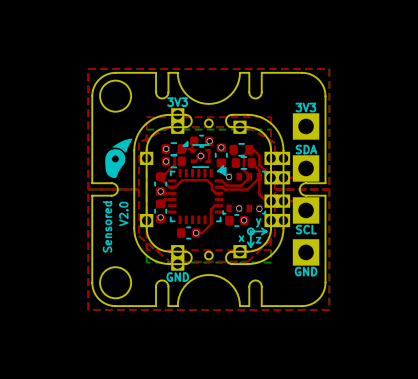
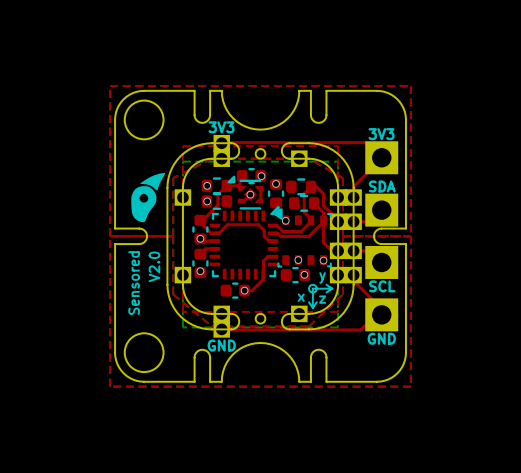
top track: none -> (221, 142) (365, 142) (381, 158) (354, 186) (354, 200)
top track: none -> (354, 281) (381, 309) (360, 329) (221, 329)

